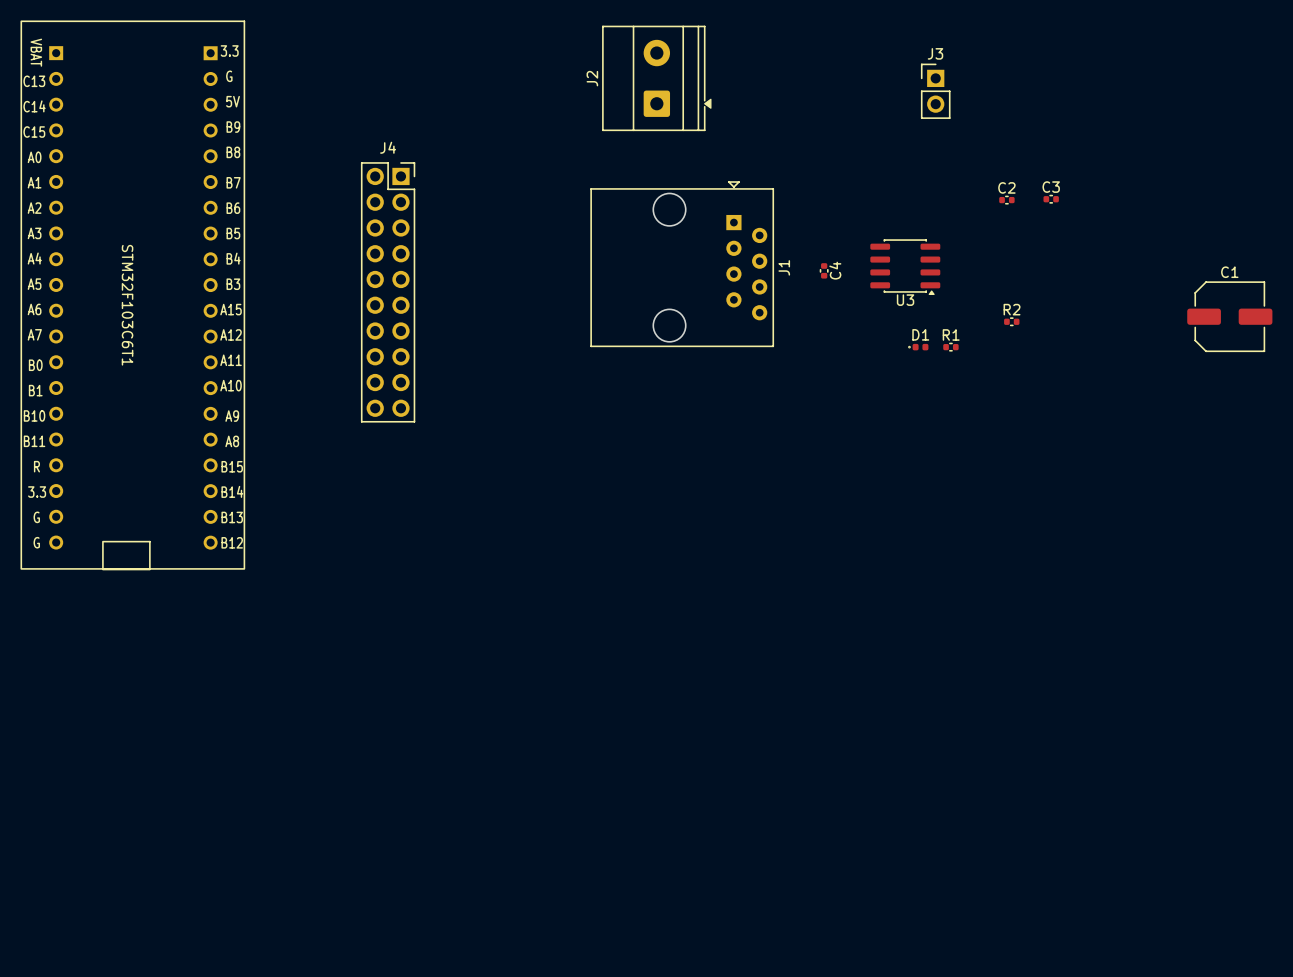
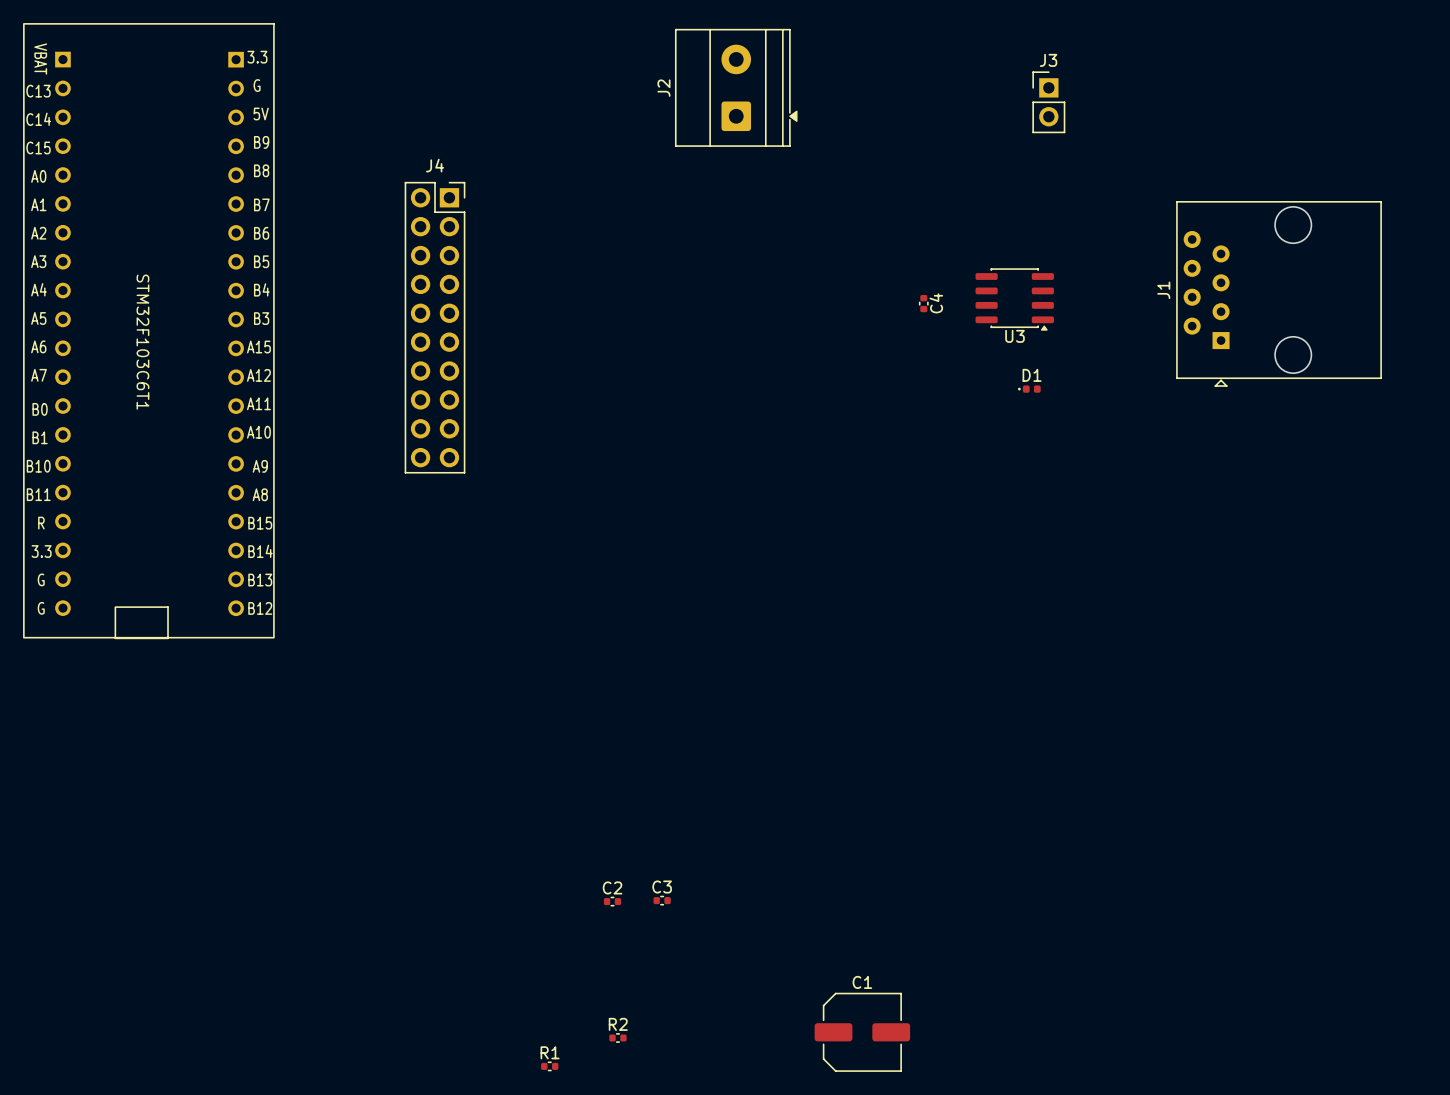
C3 position: (1051, 199) -> (662, 900)
C2 position: (1006, 200) -> (612, 901)
J1 rotation: 0° (682, 264) -> 180° (1279, 293)
J1 position: (682, 264) -> (1279, 293)
C1 position: (1229, 316) -> (862, 1032)
R2 position: (1011, 321) -> (617, 1037)
R1 position: (950, 347) -> (549, 1066)

